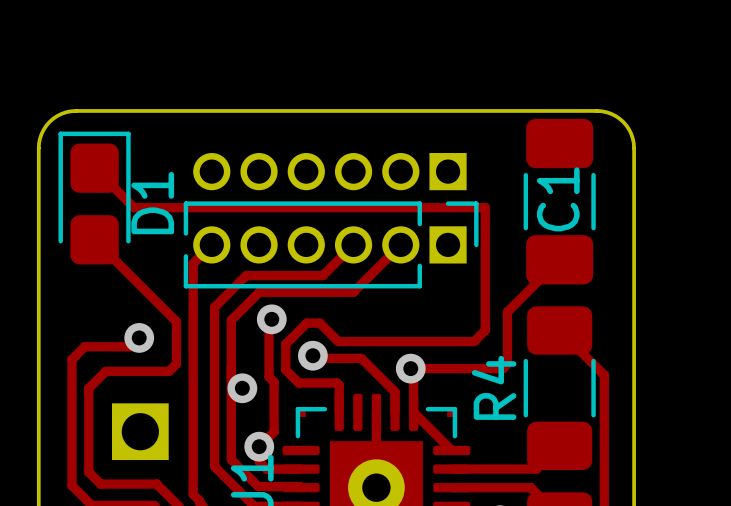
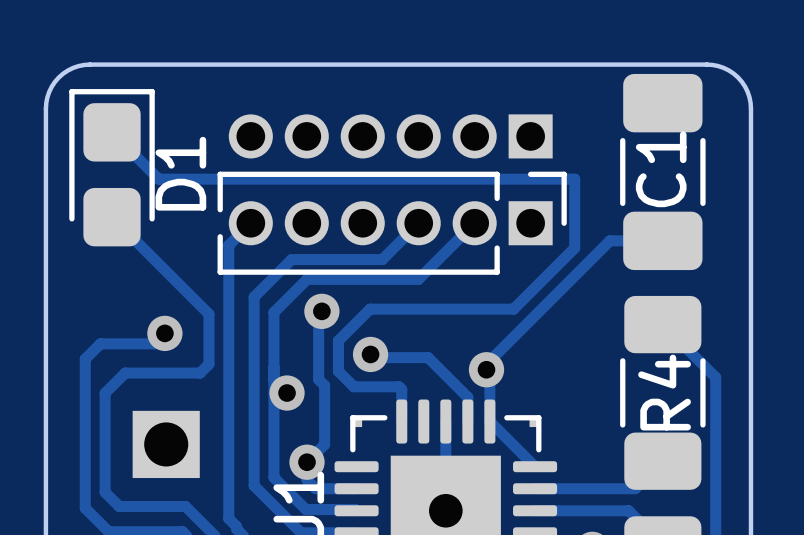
track: (559, 259) (507, 312) (507, 364) (502, 368) (410, 368) (413, 371) -> (662, 240) (609, 240) (486, 364) (489, 367) (489, 373)
track: (485, 265) (485, 330) (474, 341) (338, 341) (319, 323) (306, 323) -> (574, 248) (513, 309) (370, 309) (363, 315)
R4 name position: R4 (494, 387) -> R4 (664, 392)

